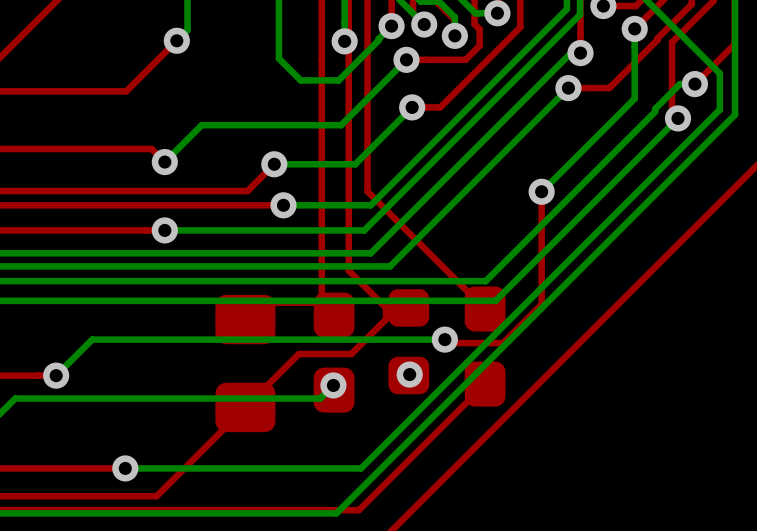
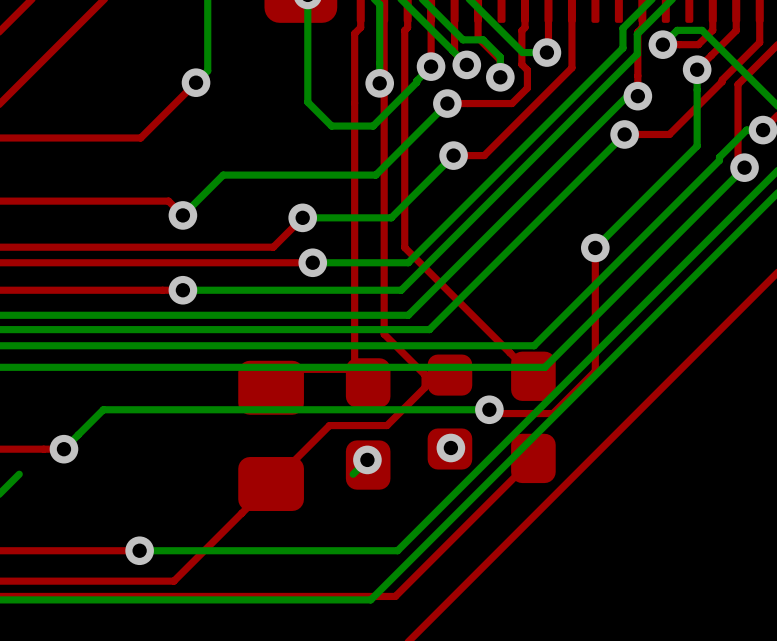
bottom track: (320, 398) (15, 398) -> none

